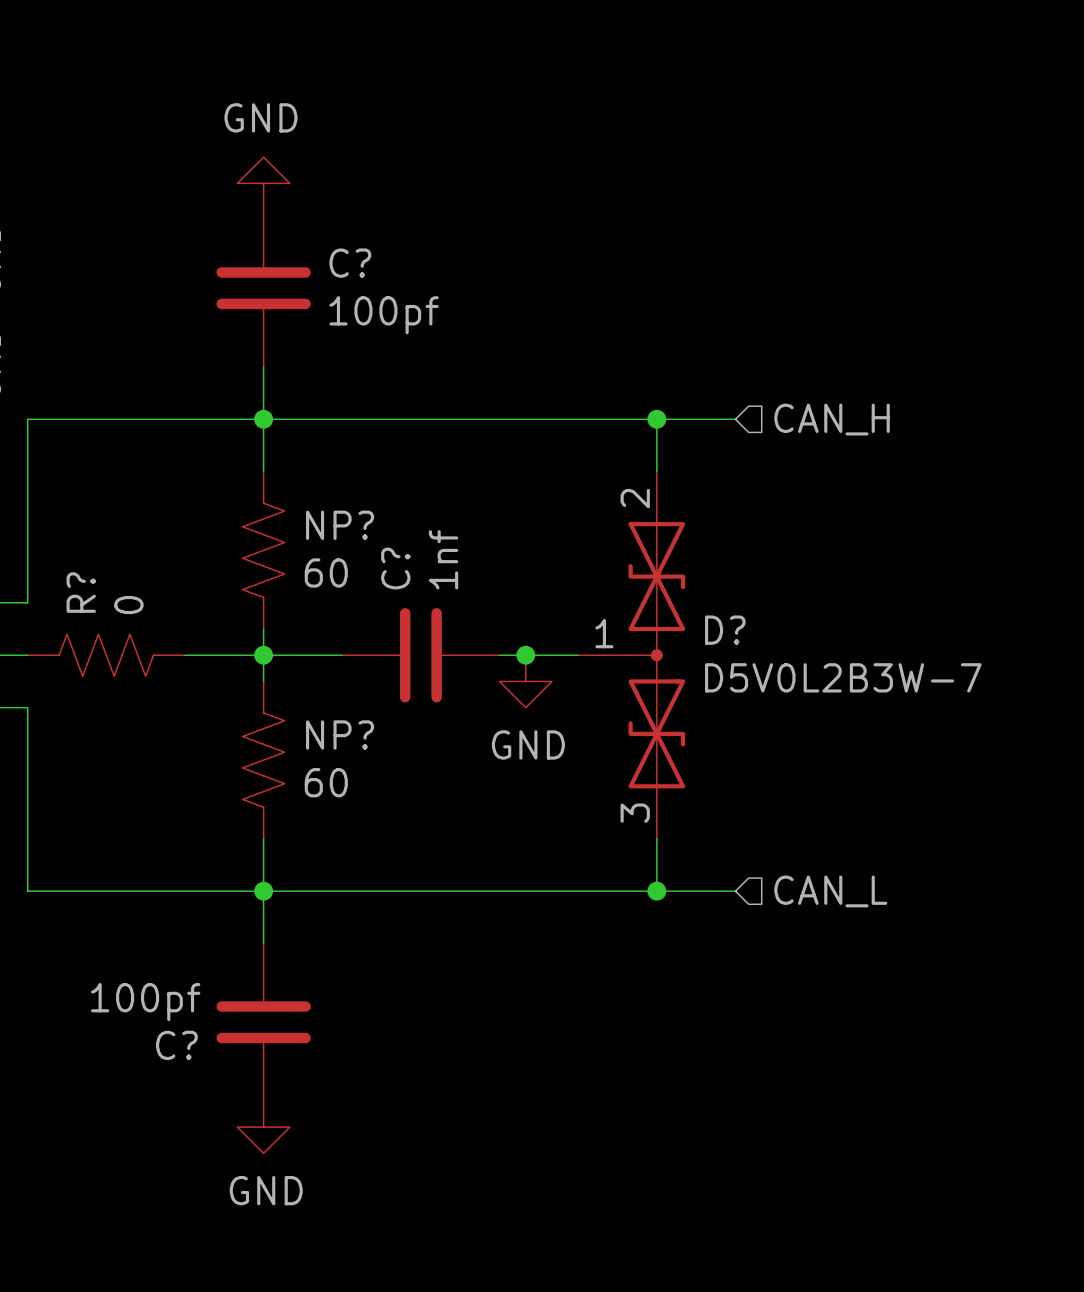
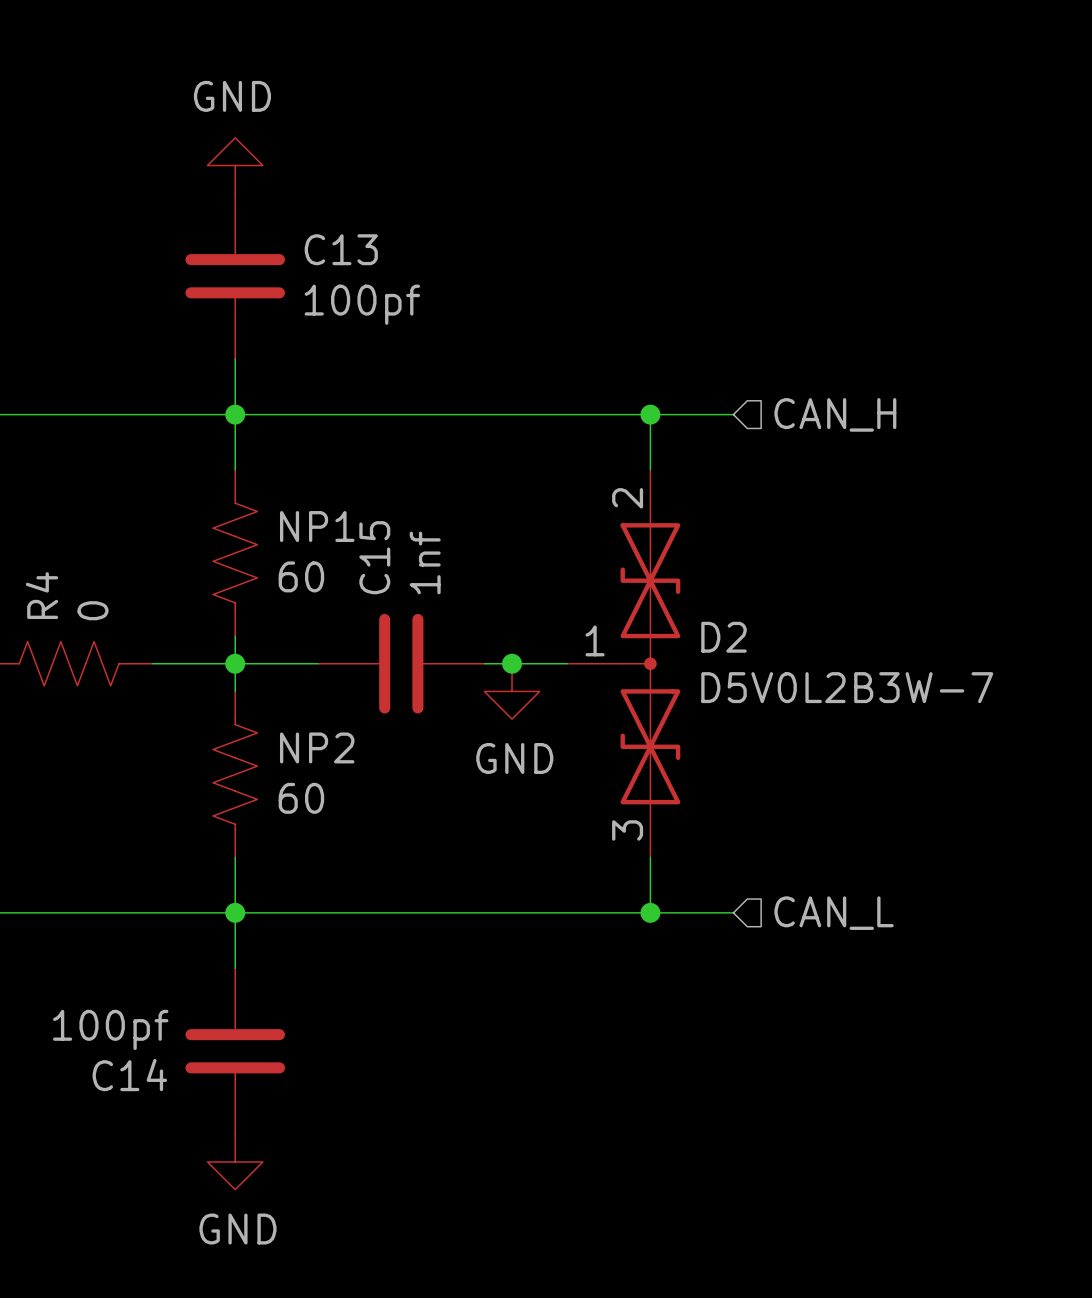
C? name: C? (350, 263) -> C13 (341, 249)
NP? name: NP? (340, 525) -> NP1 (317, 526)
C? name: C? (395, 568) -> C15 (374, 557)
R? name: R? (81, 592) -> R4 (41, 595)
D? name: D? (725, 630) -> D2 (724, 637)
NP? name: NP? (340, 735) -> NP2 (317, 747)
C? name: C? (176, 1045) -> C14 (129, 1075)

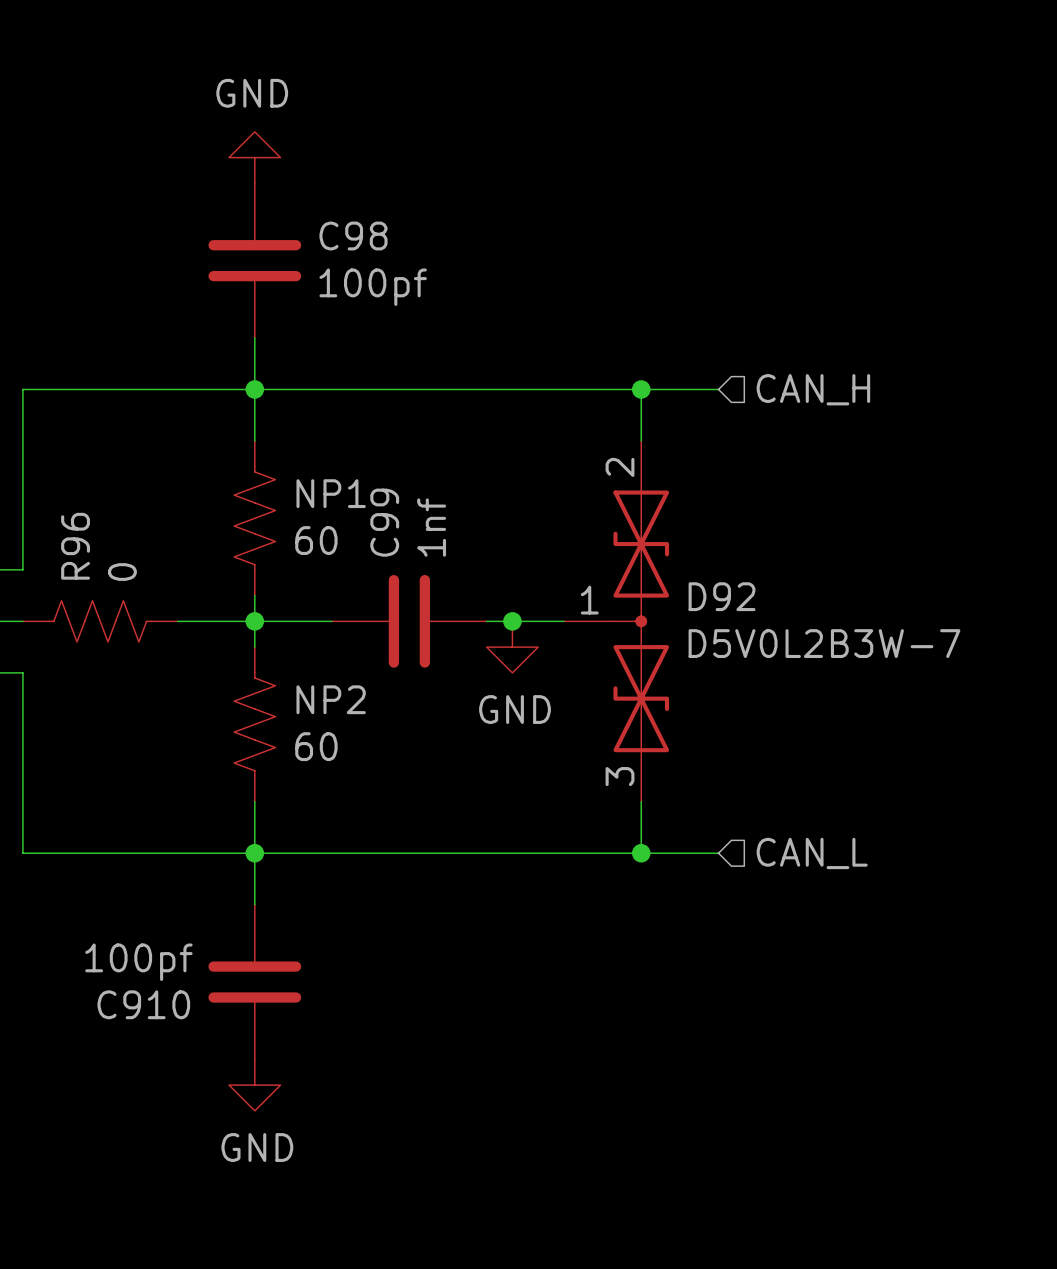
C13 name: C13 (341, 249) -> C98 (353, 236)
C15 name: C15 (374, 557) -> C99 (384, 522)
R4 name: R4 (41, 595) -> R96 (75, 546)
D2 name: D2 (724, 637) -> D92 (722, 596)
C14 name: C14 (129, 1075) -> C910 (143, 1004)

